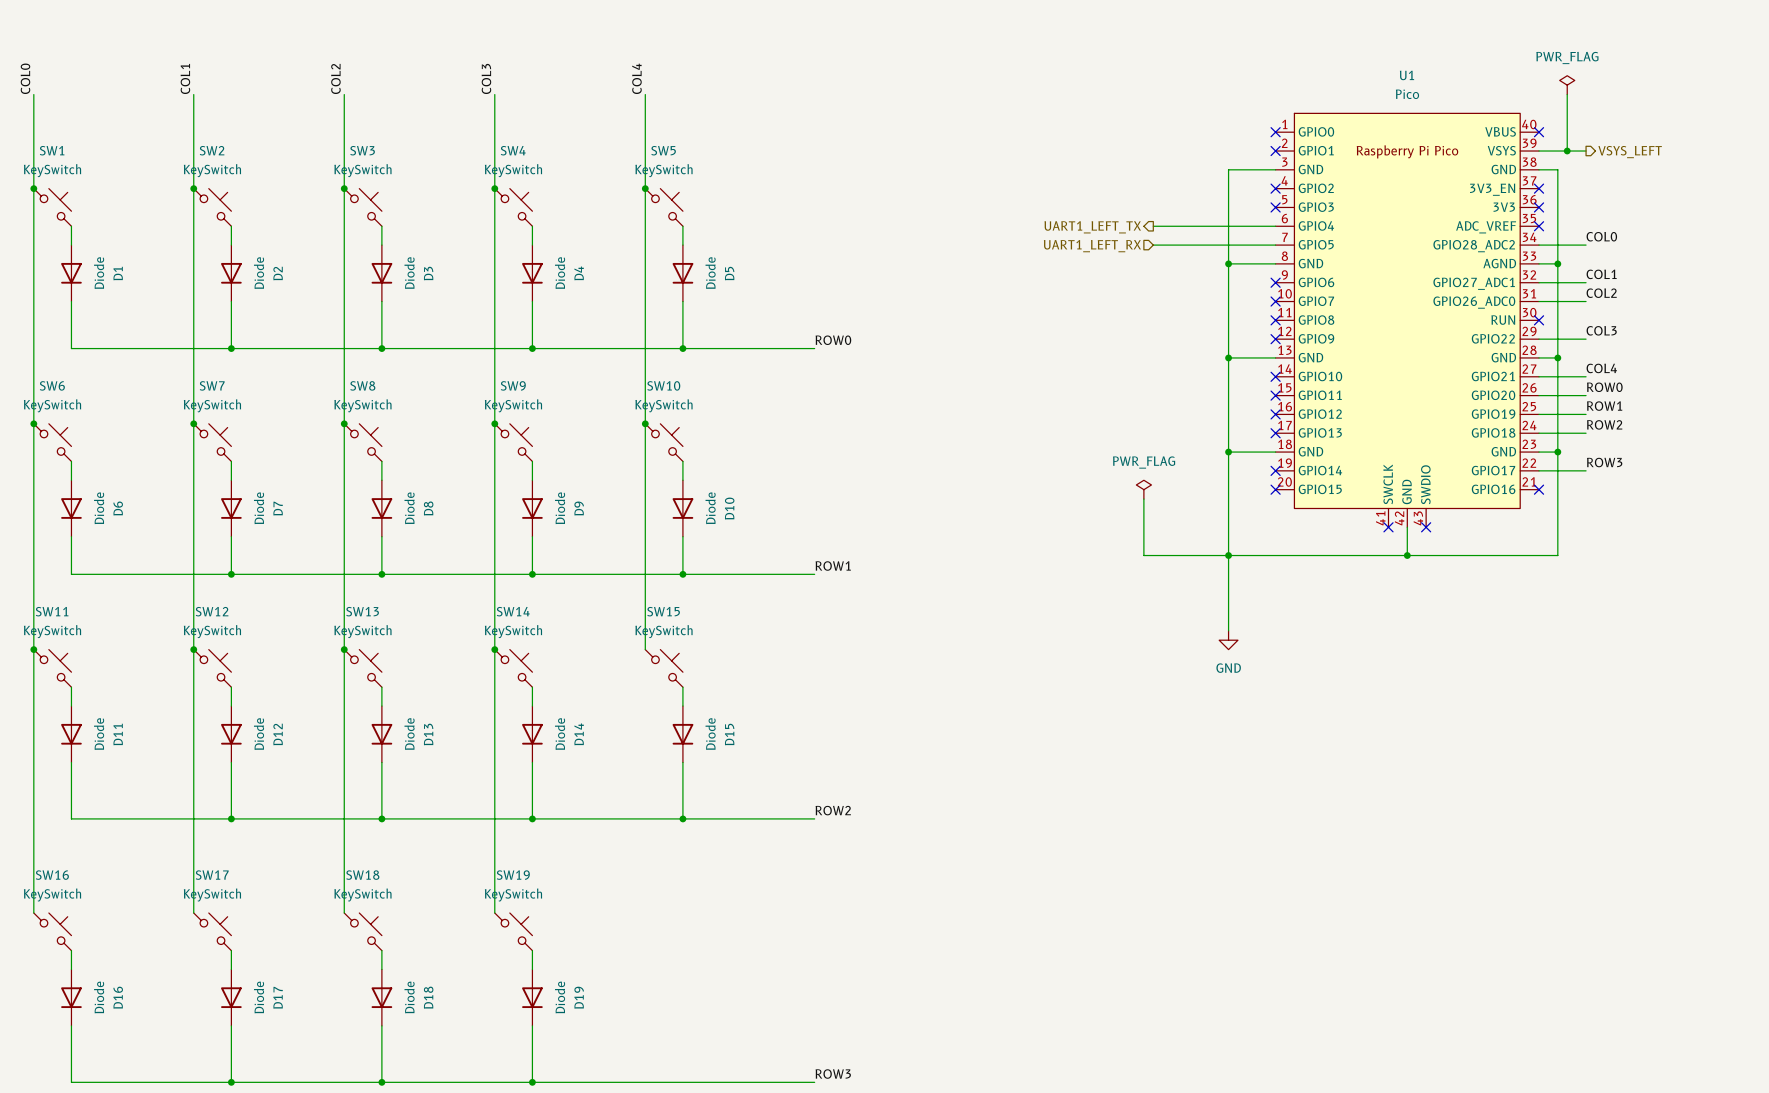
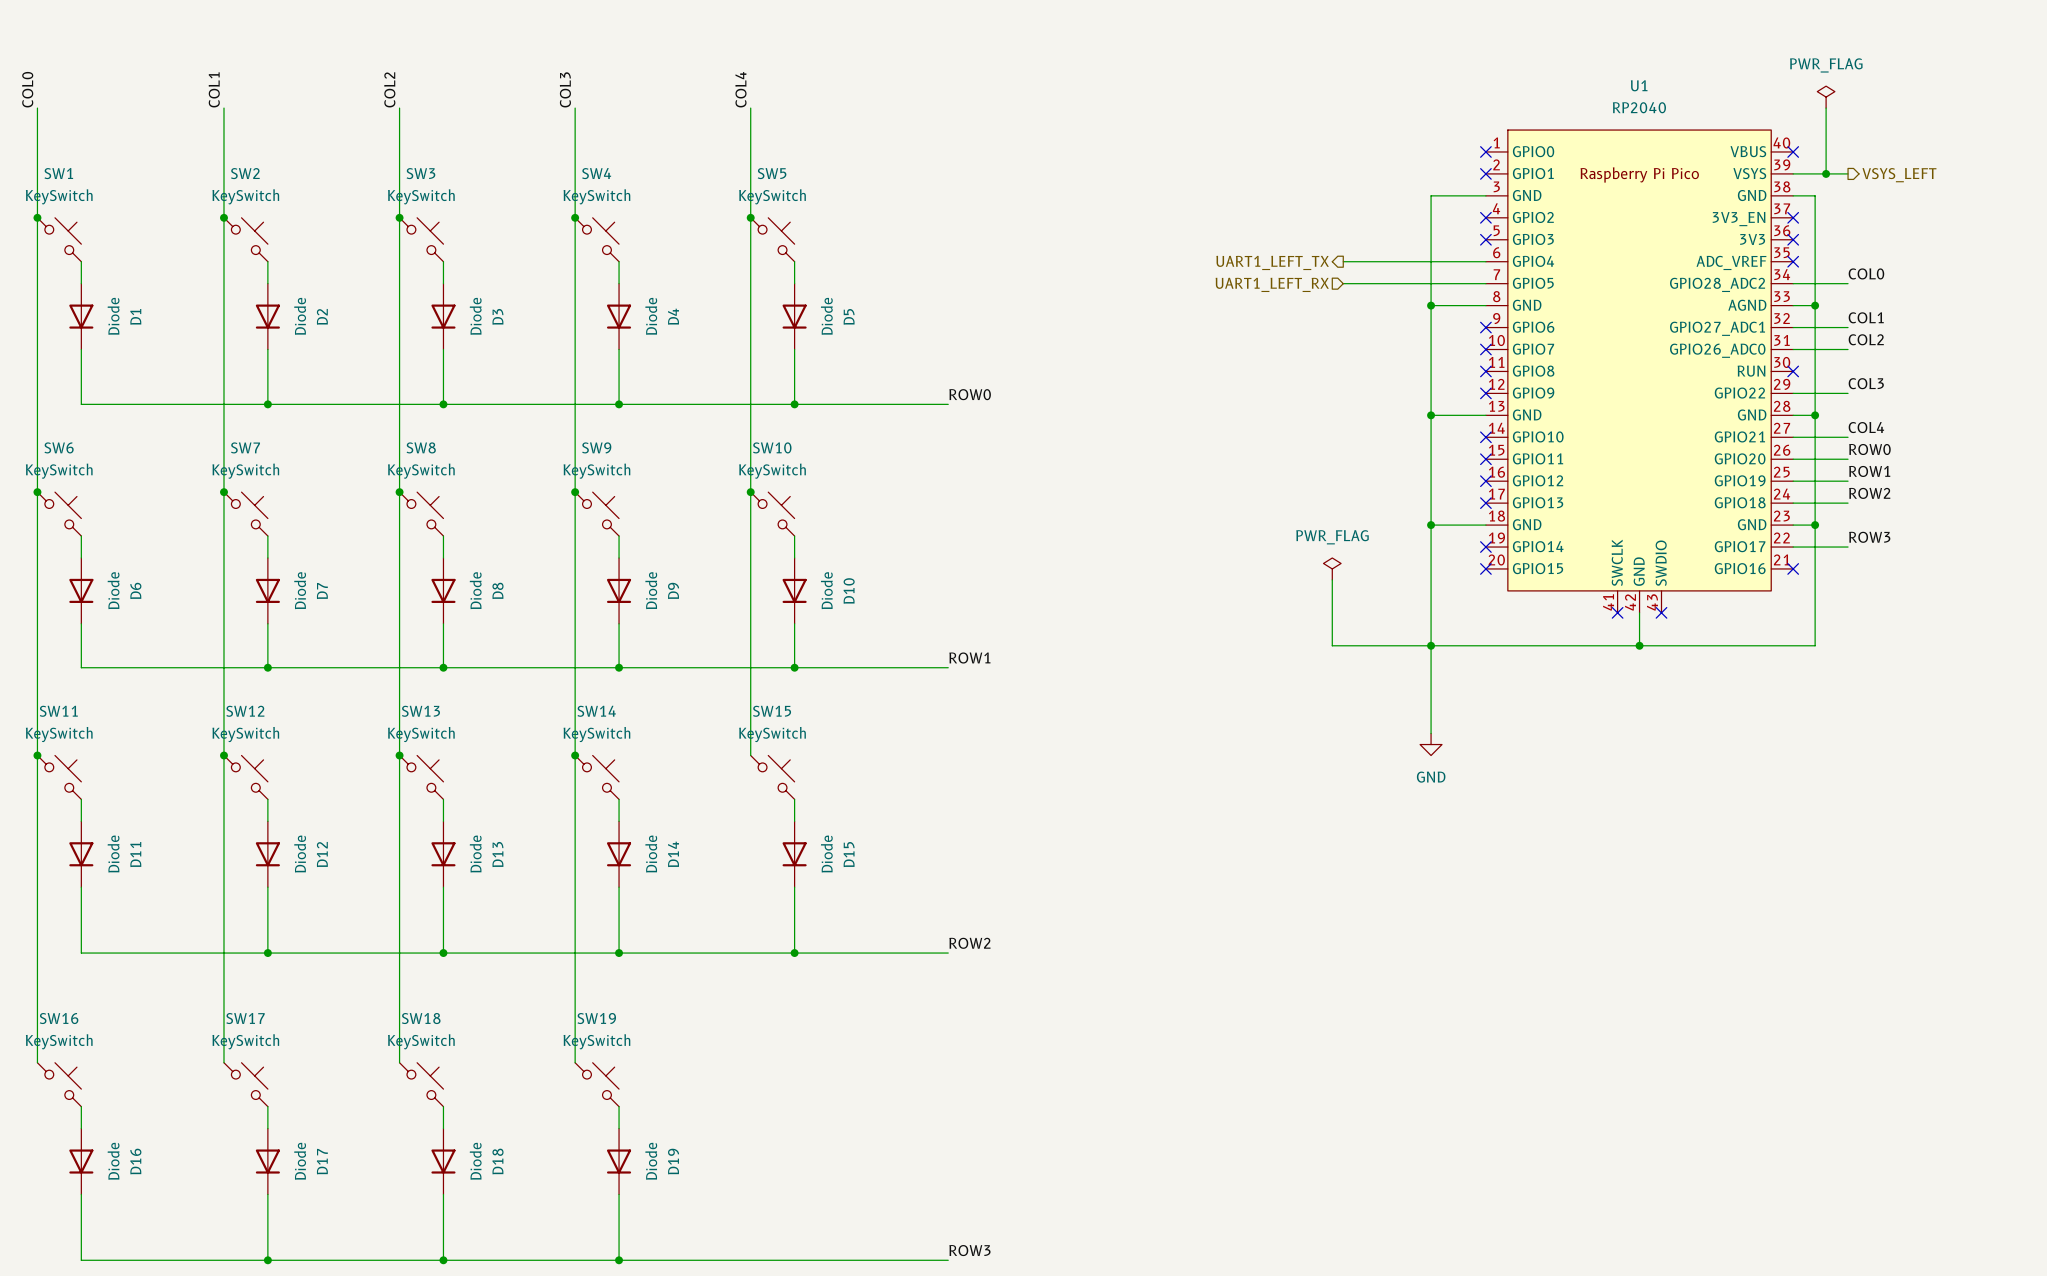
U1 value: Pico (1407, 94) -> RP2040 (1639, 107)

